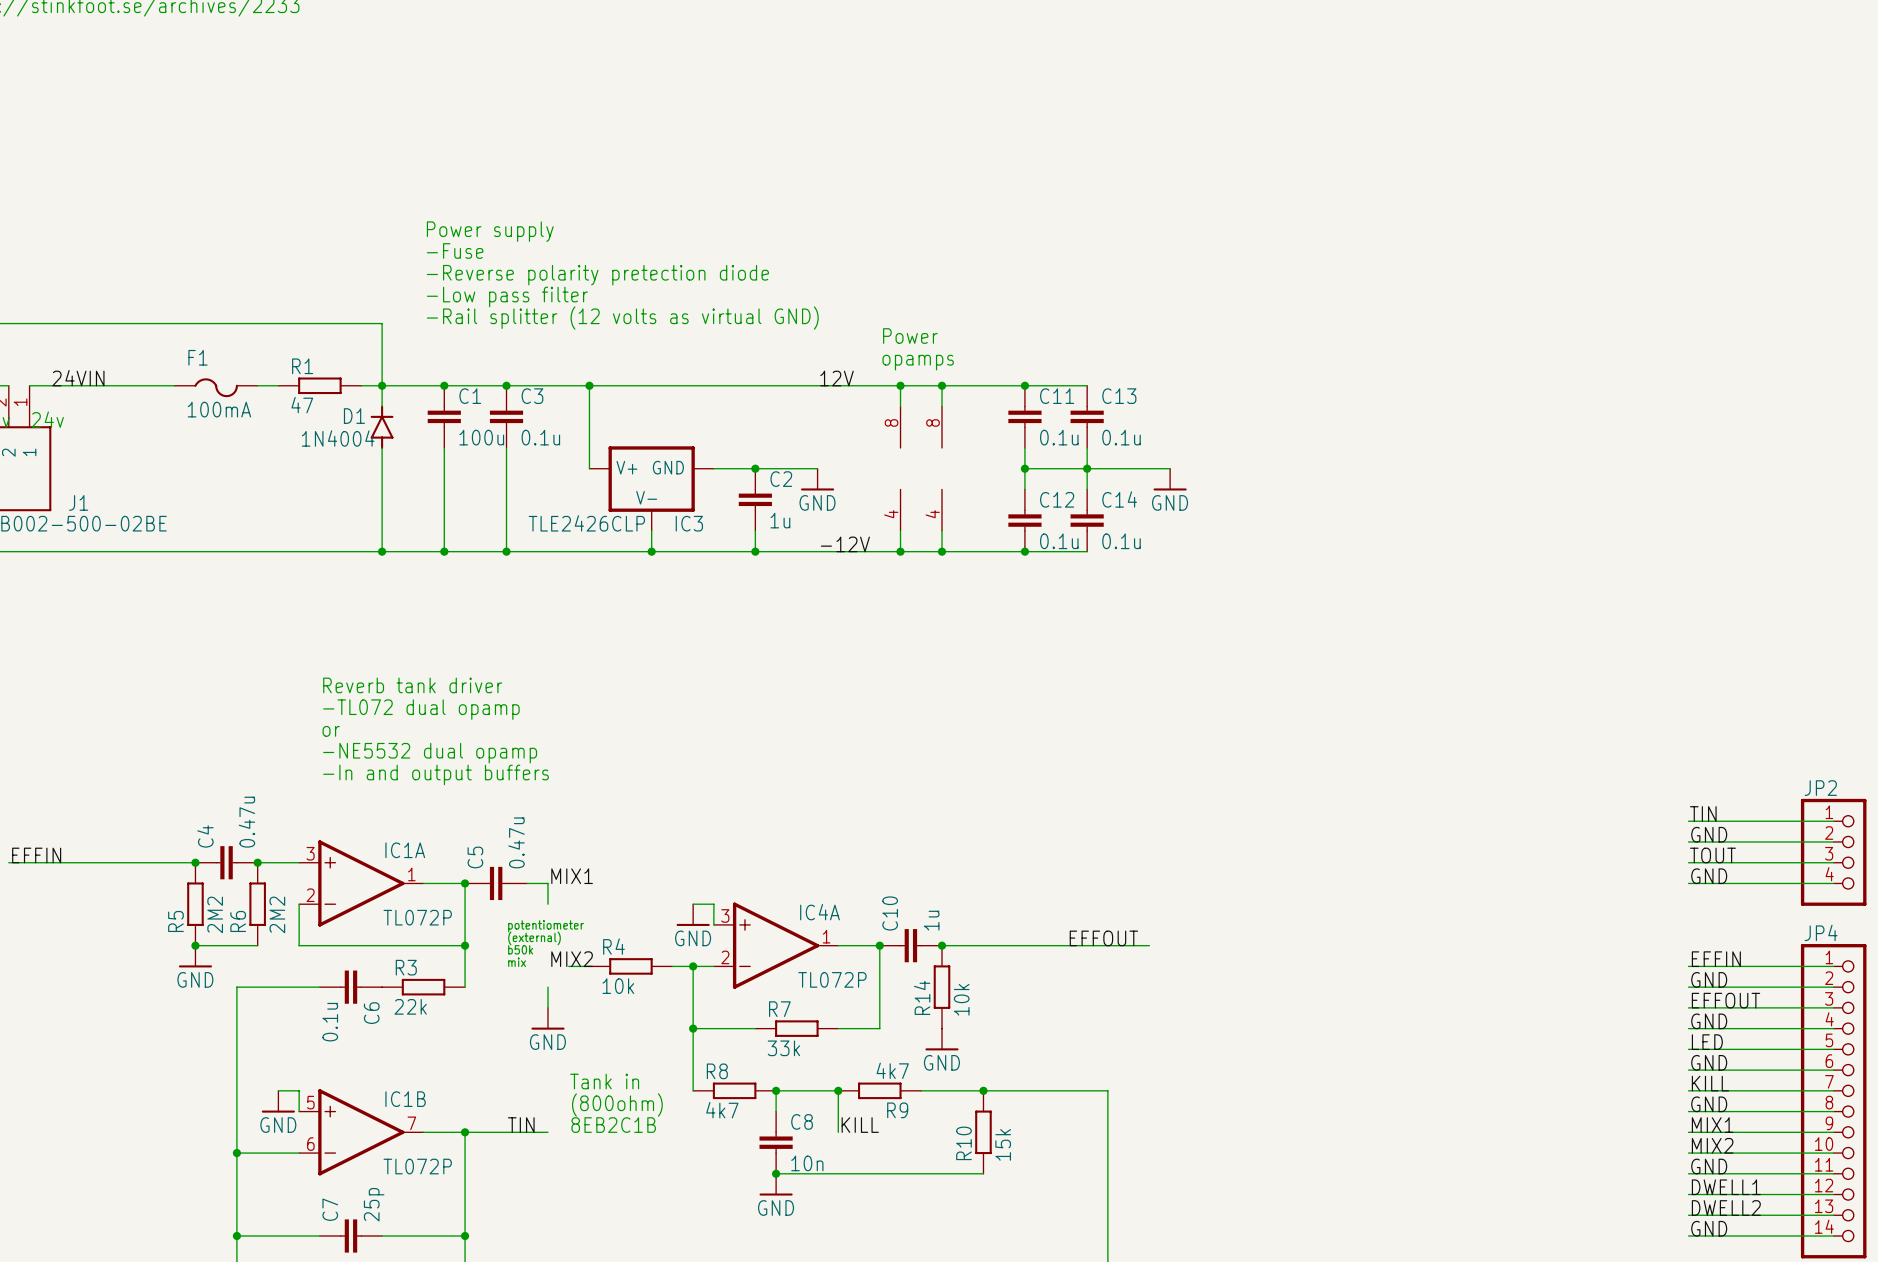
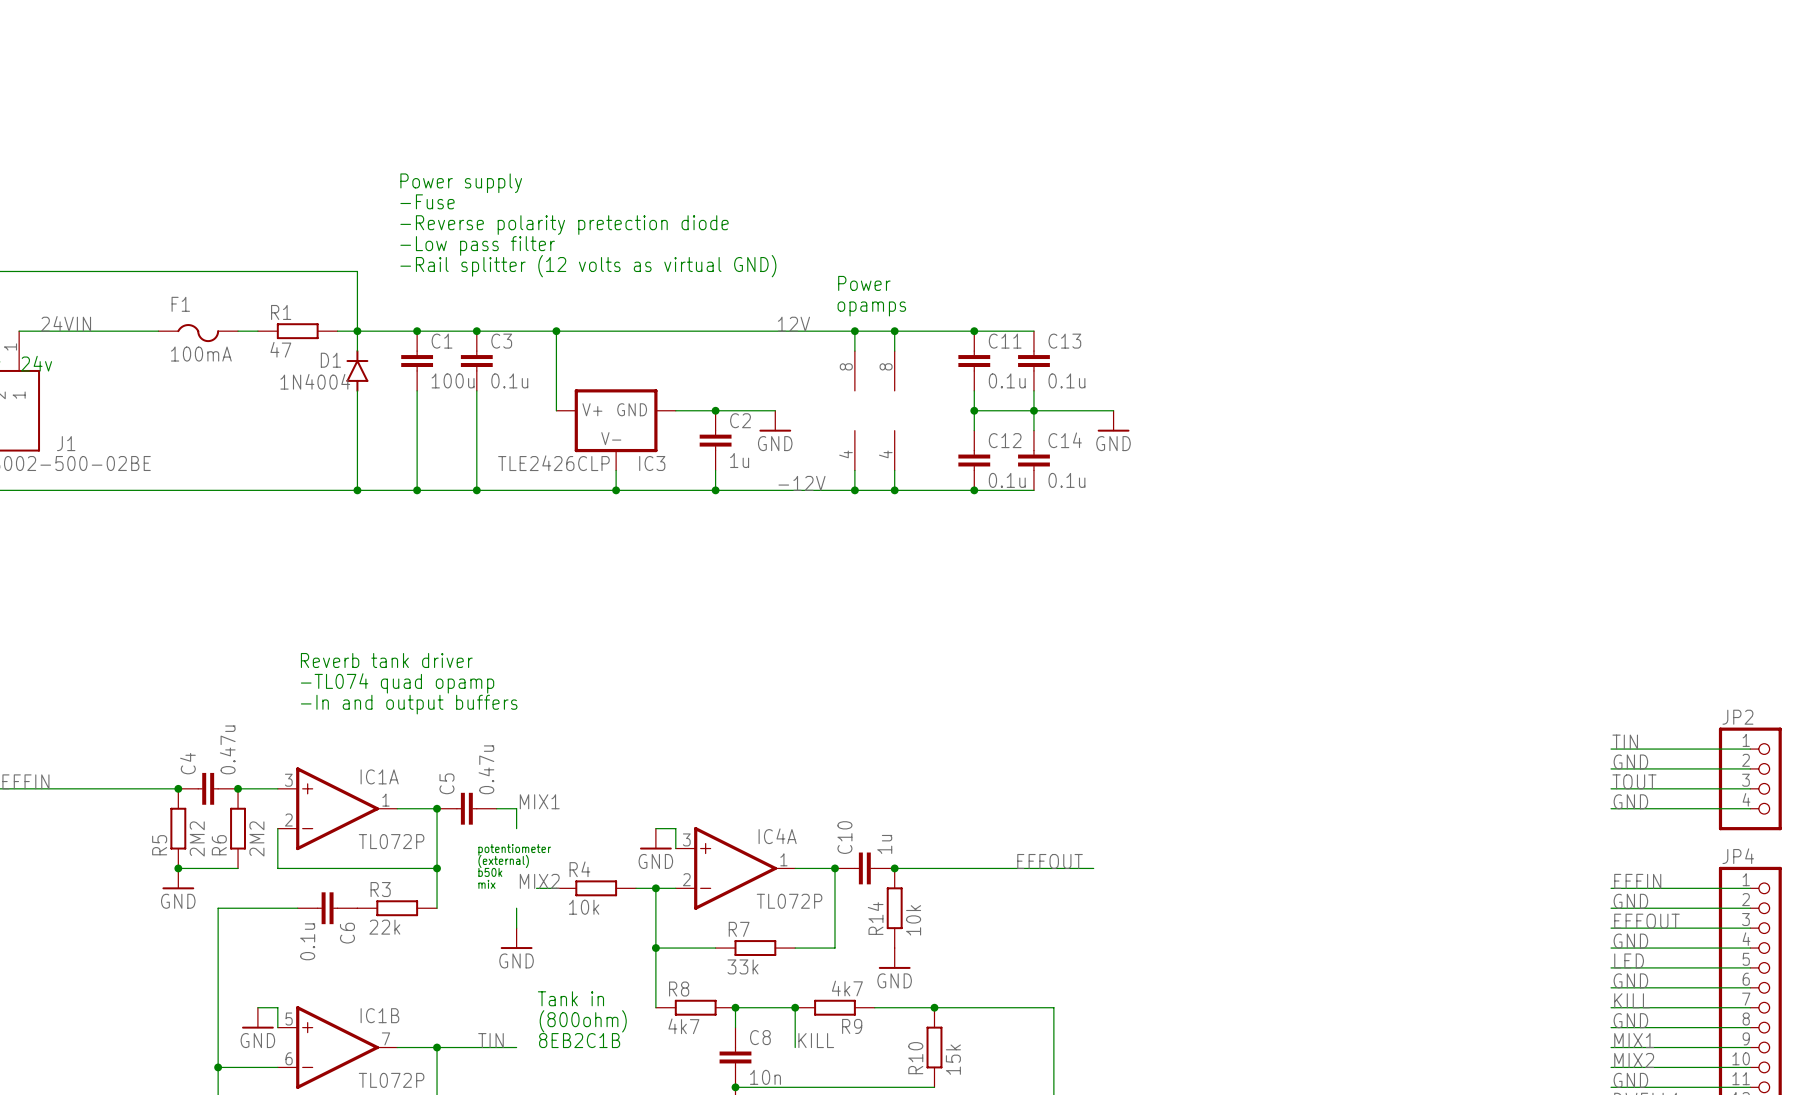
text: Reverb tank driver (412, 685) -> none
text: -TL072 dual opamp (421, 709) -> none
text: or (331, 731) -> Reverb tank driver (386, 660)
text: -NE5532 dual opamp (430, 753) -> -TL074 quad opamp (397, 683)

